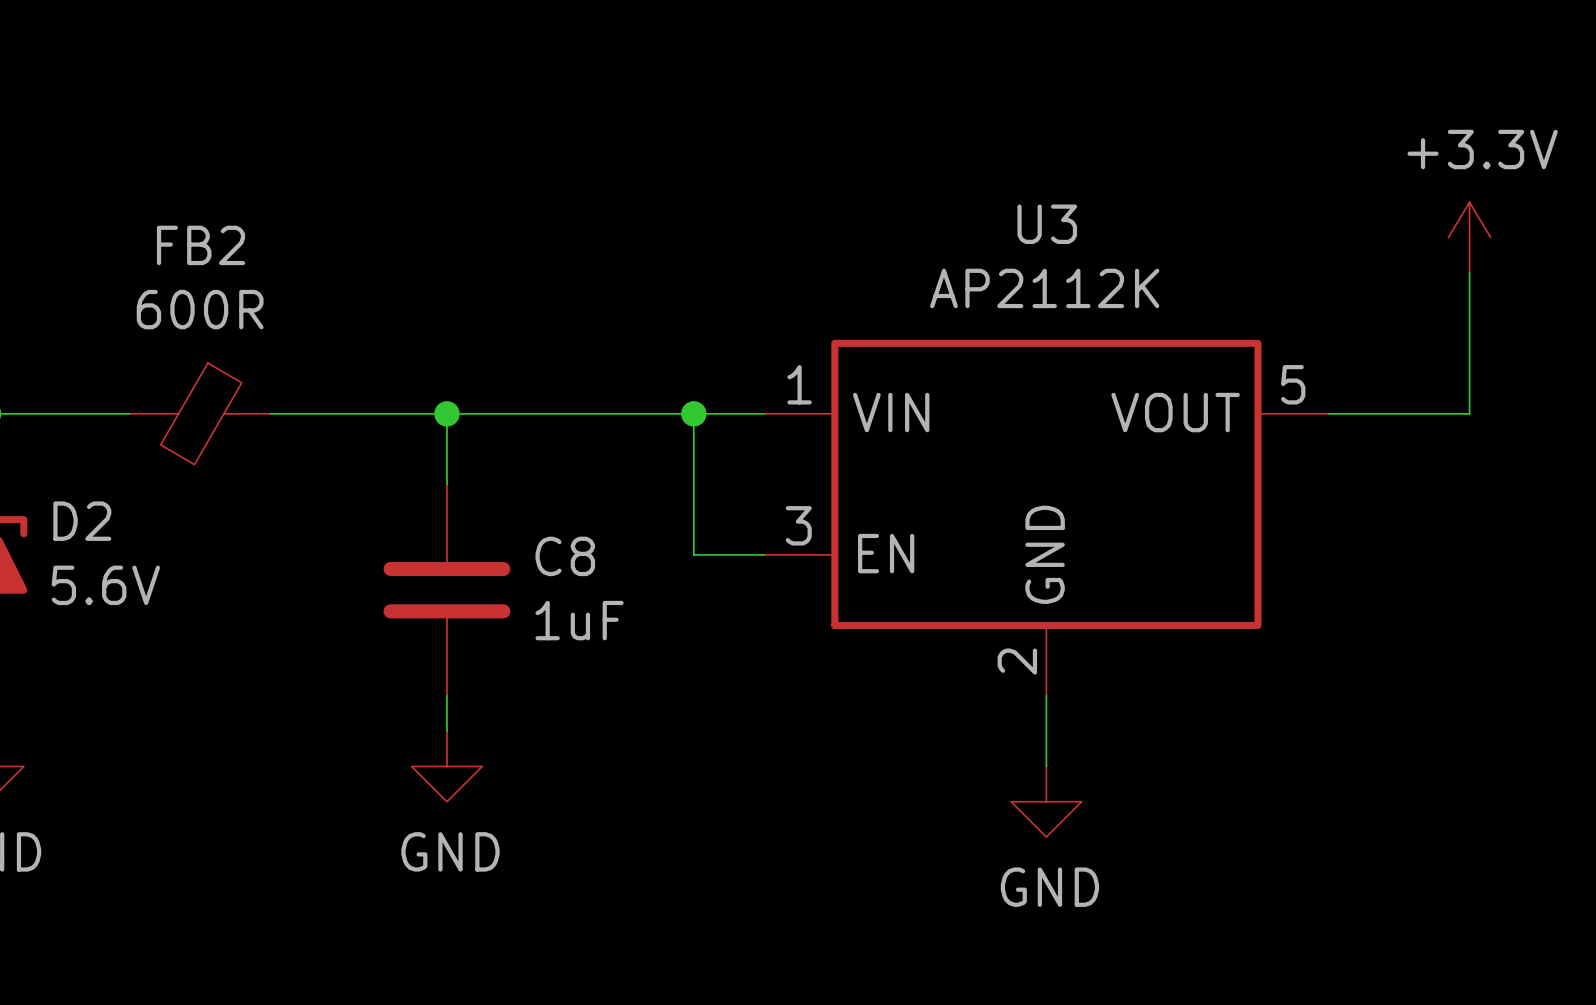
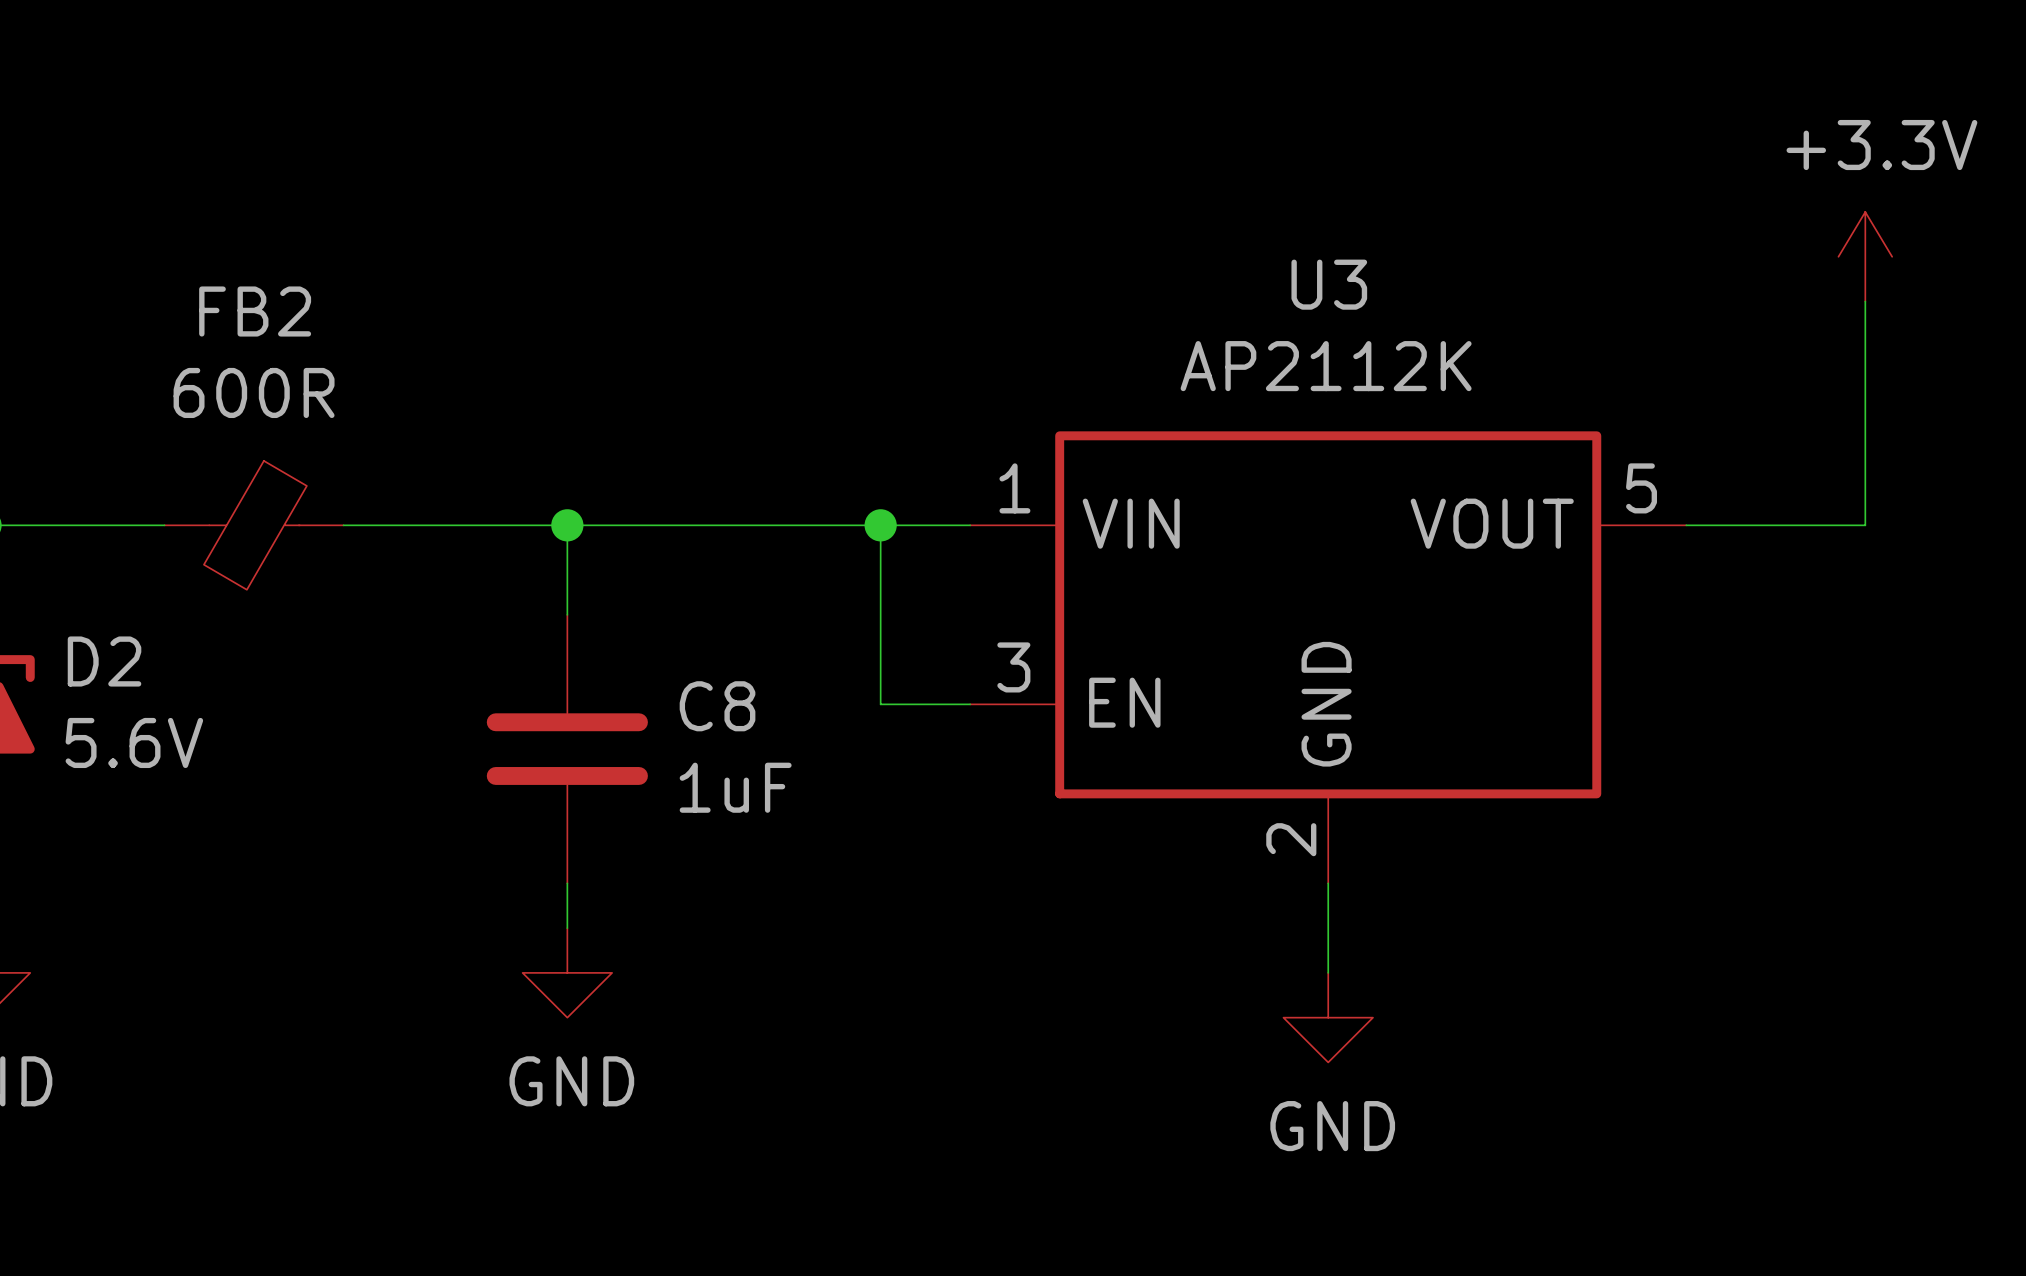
power symbol position: +3.3V (1469, 237) -> +3.3V (1865, 256)

